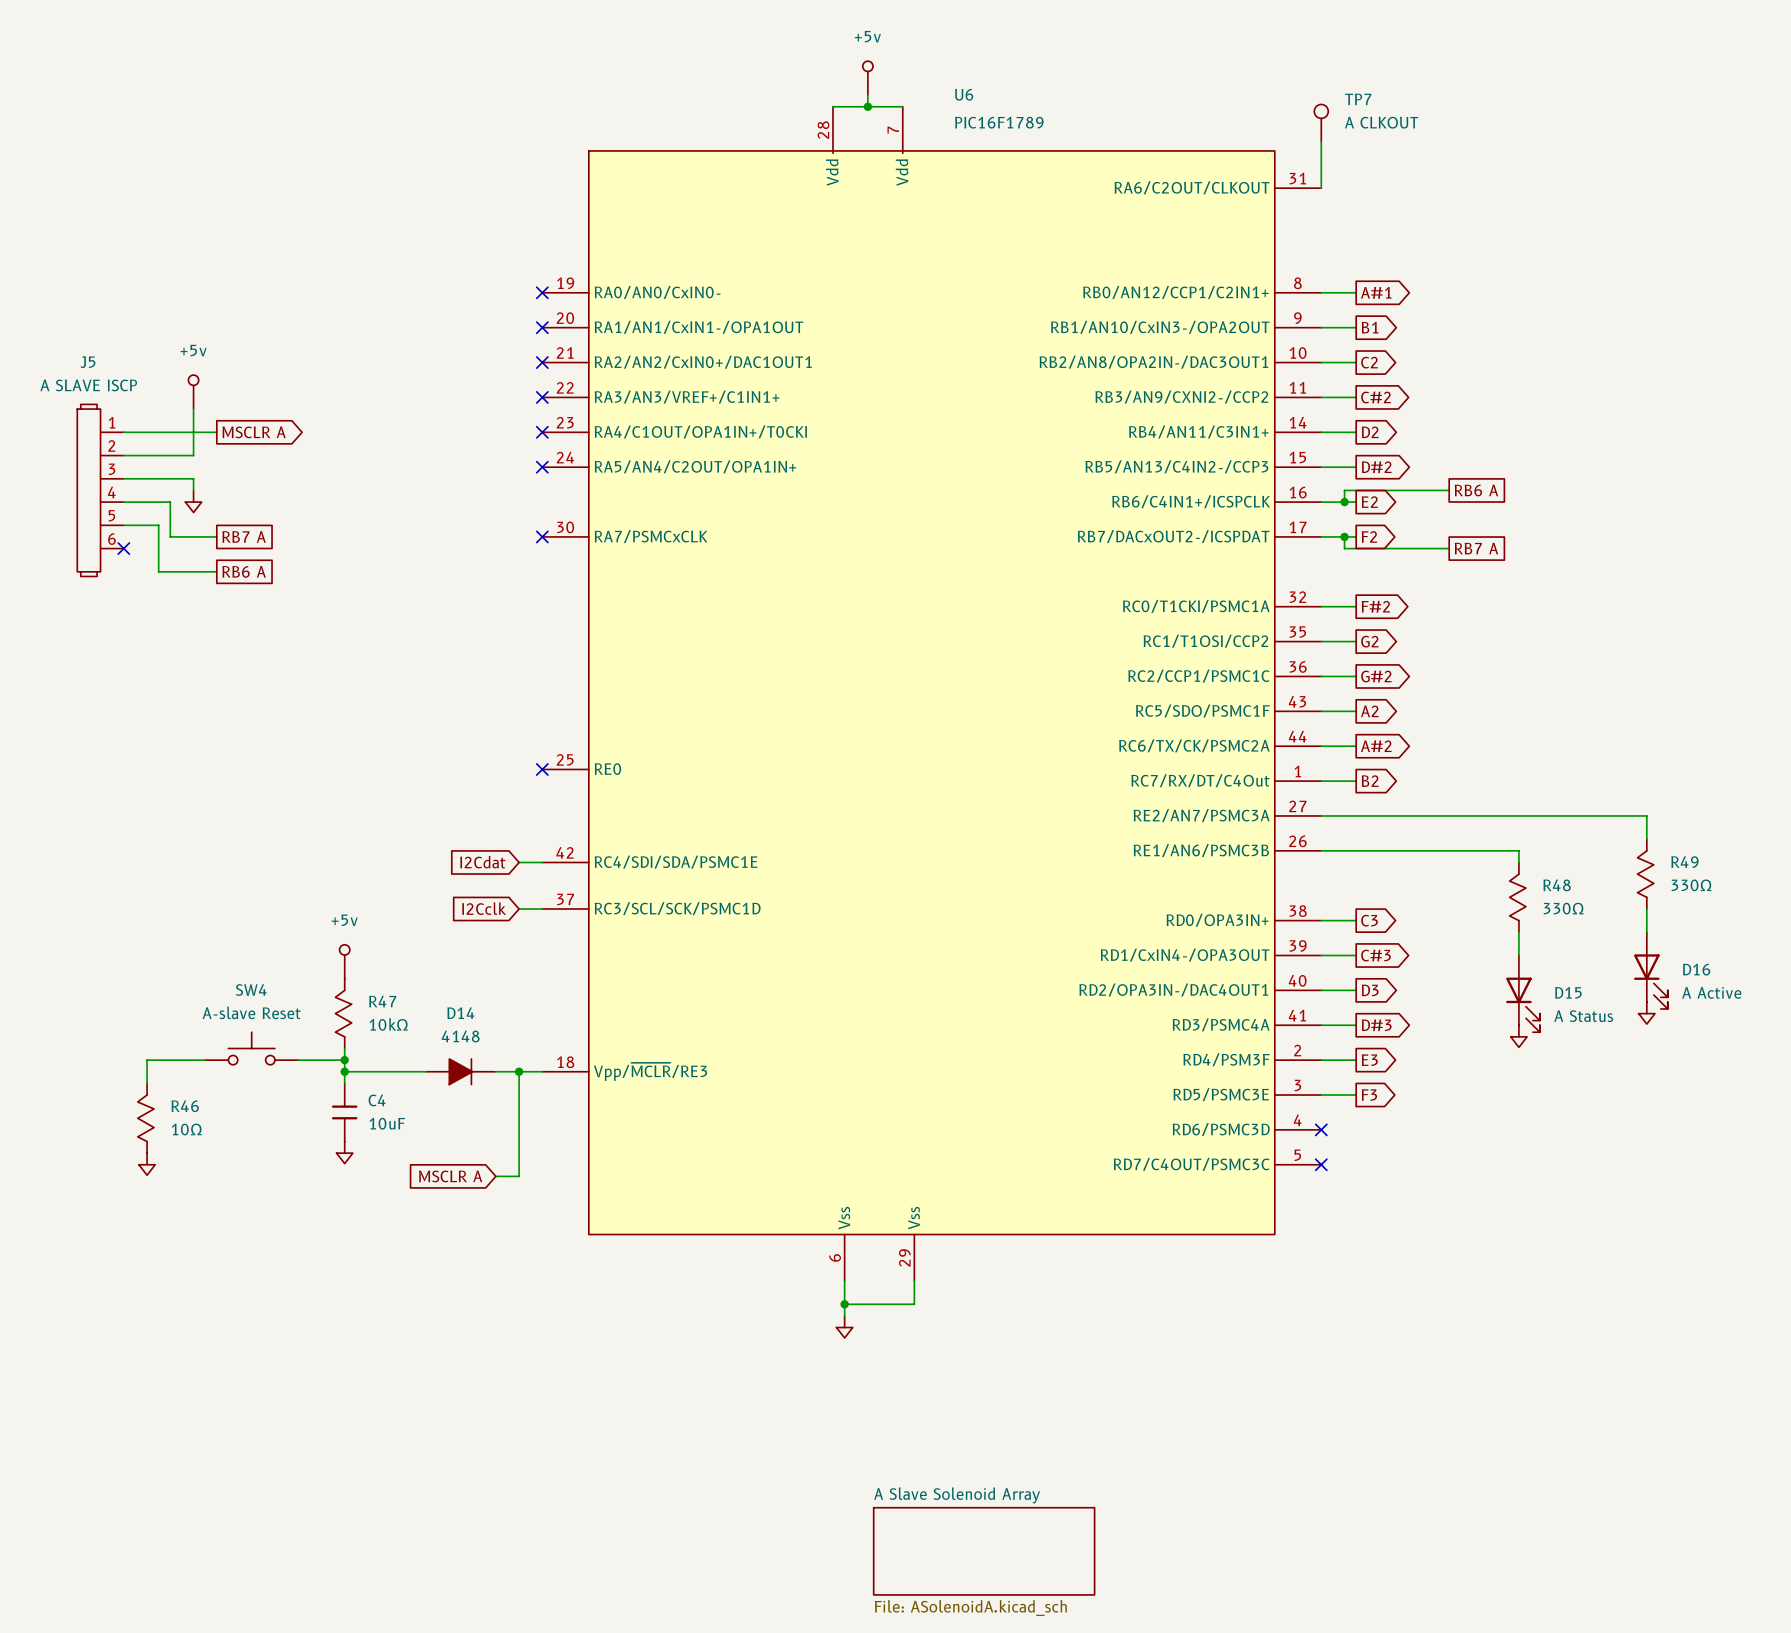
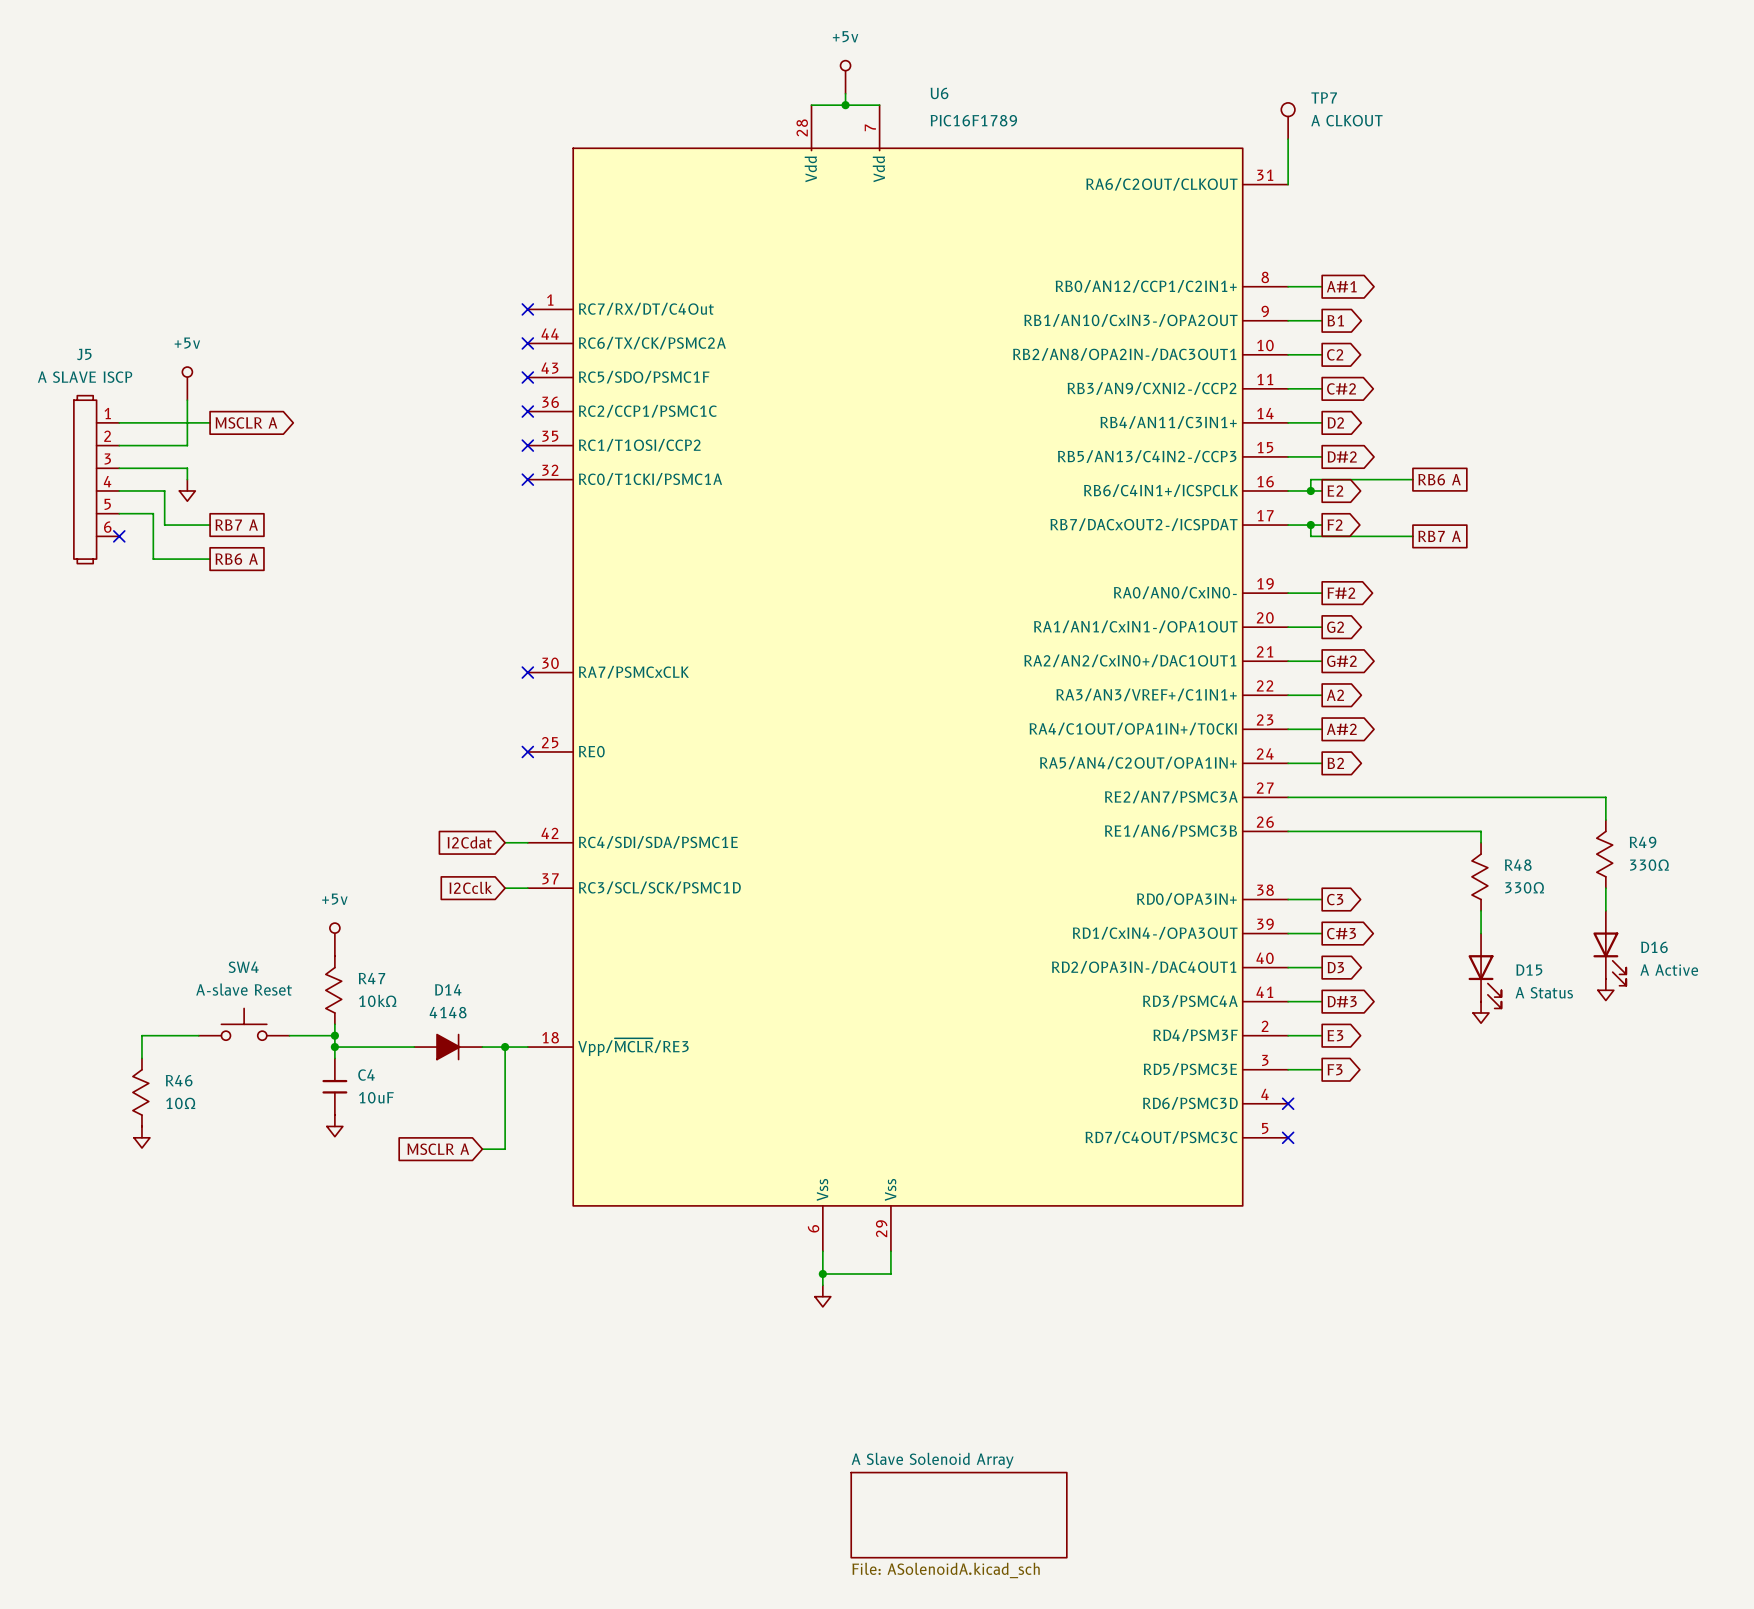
U6 symbol: [542, 106, 1322, 1282] -> [527, 105, 1289, 1252]
no-connect mark: (542, 292) -> none
no-connect mark: none -> (527, 309)
no-connect mark: (542, 327) -> none
no-connect mark: none -> (527, 343)
no-connect mark: (542, 362) -> none
no-connect mark: none -> (527, 377)
no-connect mark: (542, 397) -> none
no-connect mark: none -> (527, 411)
no-connect mark: (542, 432) -> none
no-connect mark: none -> (527, 445)
no-connect mark: (542, 467) -> none
no-connect mark: none -> (527, 479)
no-connect mark: (542, 536) -> none
no-connect mark: none -> (527, 672)

